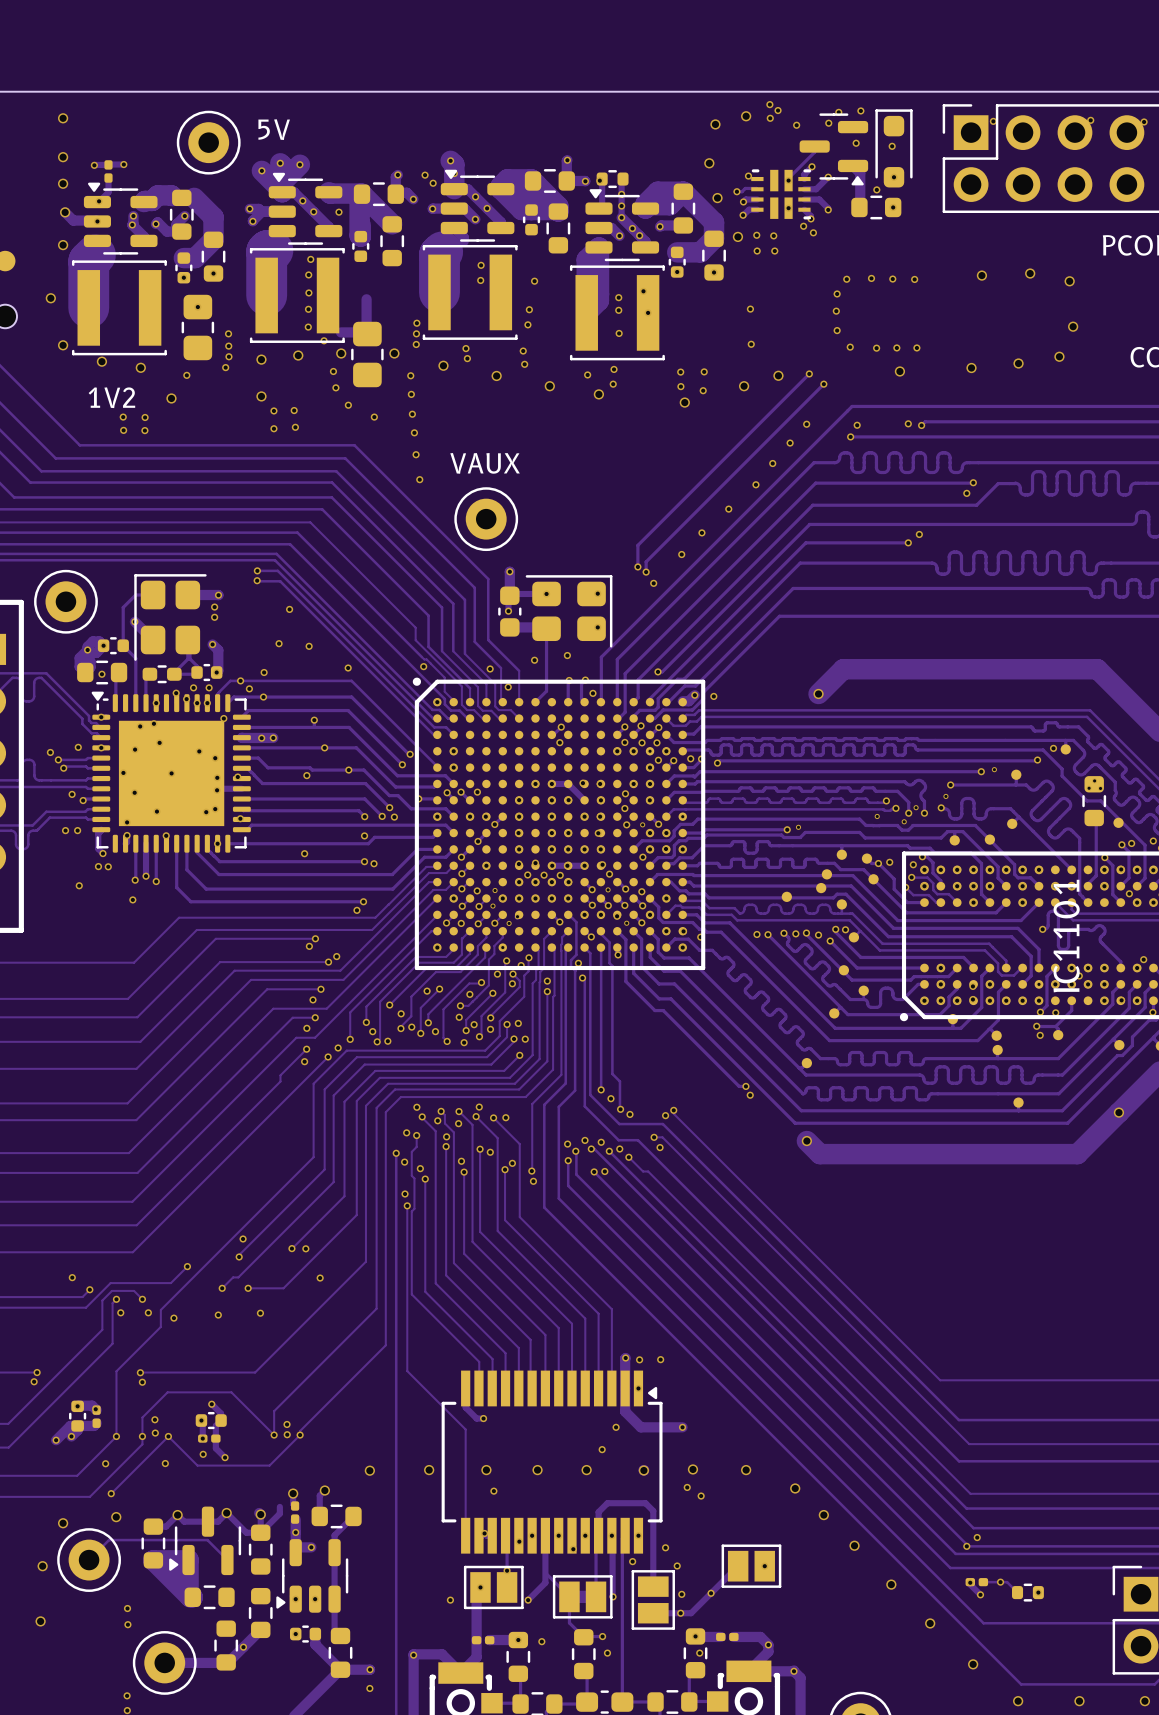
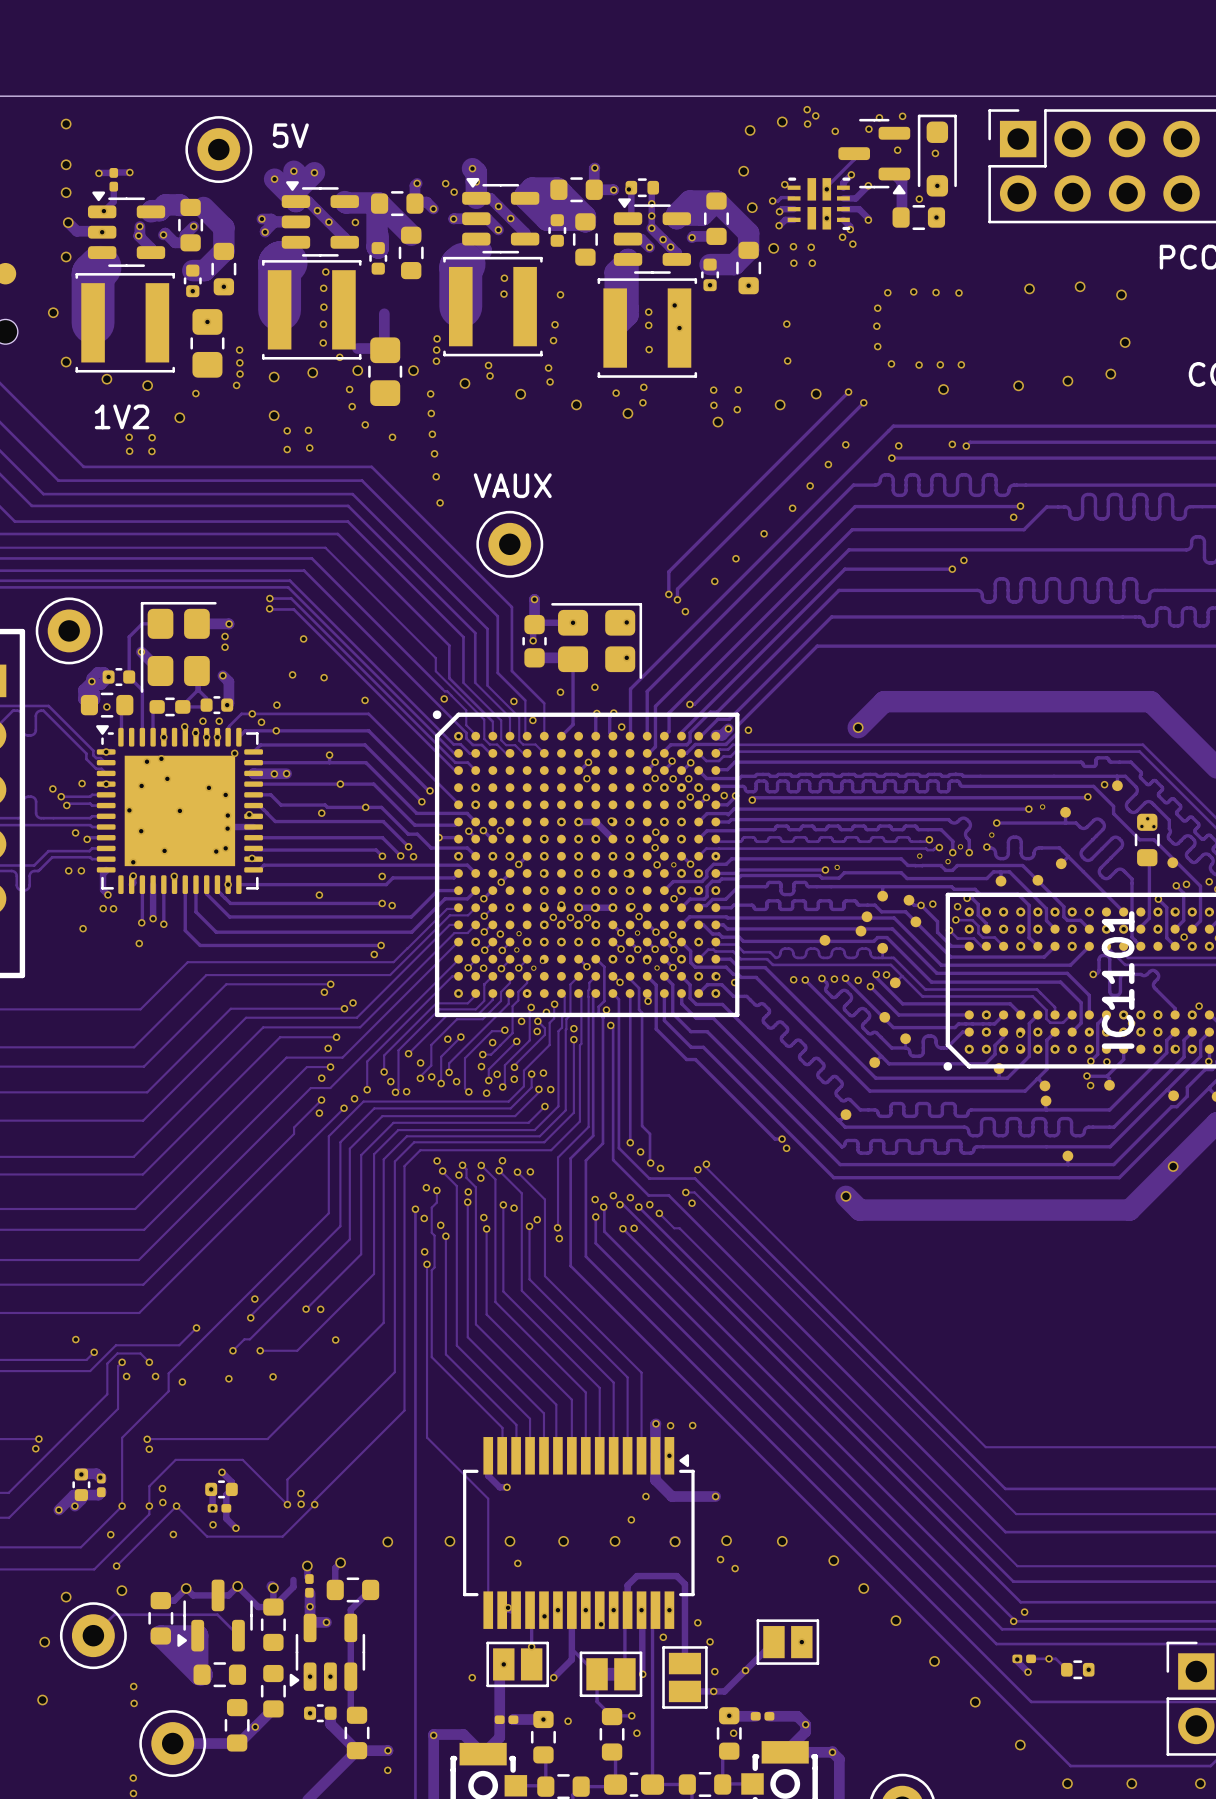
via: (1090, 120) -> none
via: (993, 121) -> none
via: (1144, 121) -> none

